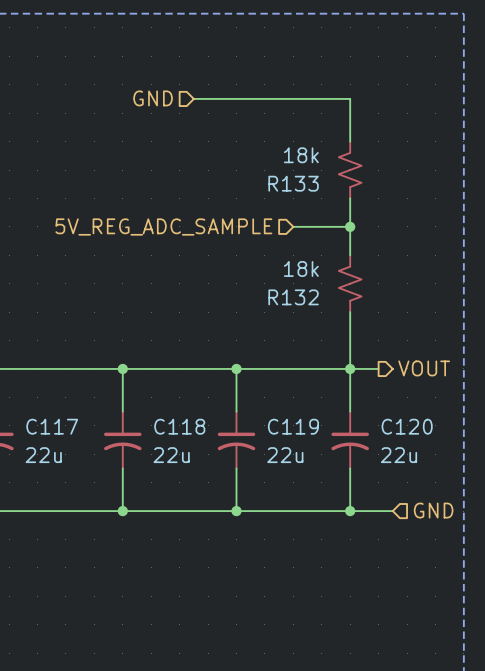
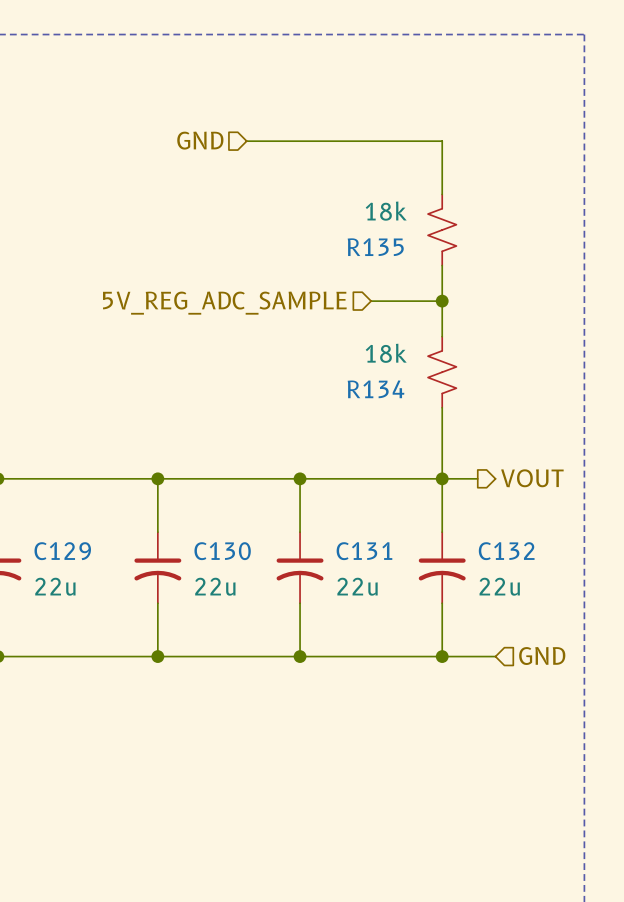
R133 name: R133 (293, 183) -> R135 (375, 247)
R132 name: R132 (293, 297) -> R134 (376, 389)
C117 name: C117 (52, 426) -> C129 (62, 551)
C118 name: C118 (179, 426) -> C130 (222, 551)
C119 name: C119 (293, 426) -> C131 (364, 551)
C120 name: C120 (407, 426) -> C132 (506, 551)

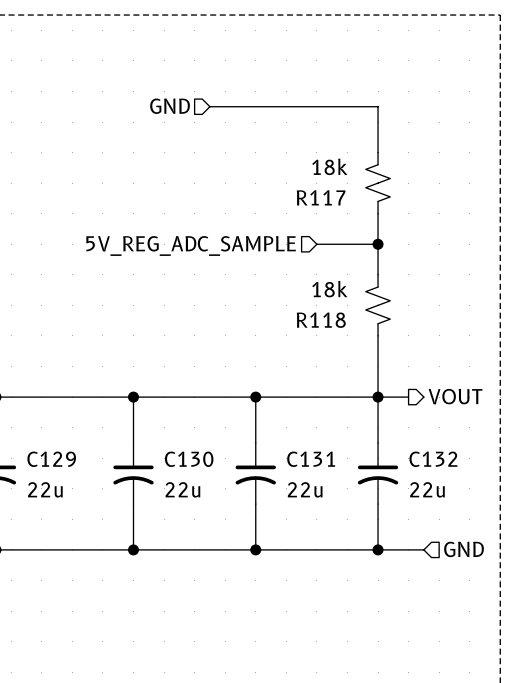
R135 name: R135 (375, 247) -> R117 (321, 197)
R134 name: R134 (376, 389) -> R118 (321, 320)

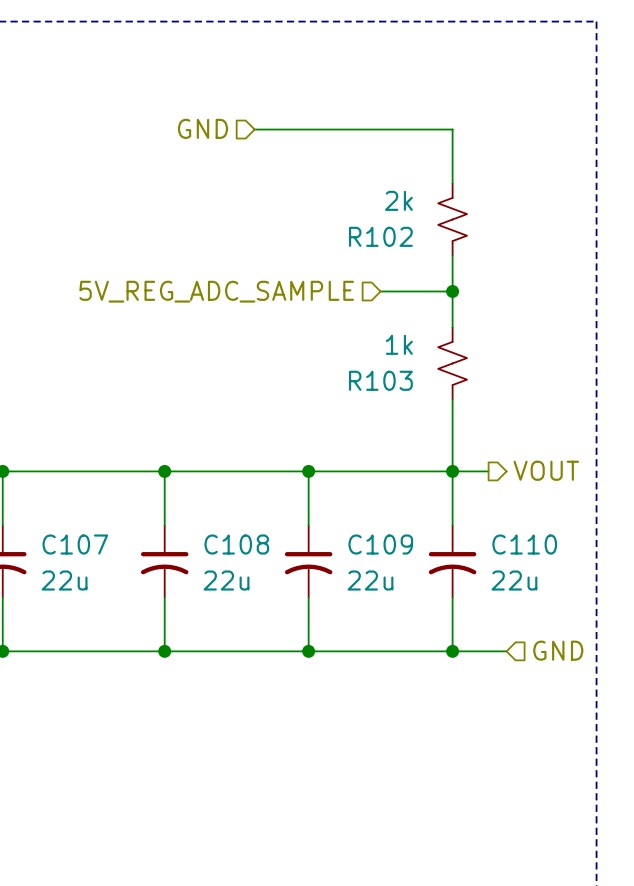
R117 value: 18k (329, 166) -> 2k (398, 200)
R117 name: R117 (321, 197) -> R102 (380, 236)
R118 value: 18k (329, 289) -> 1k (399, 344)
R118 name: R118 (321, 320) -> R103 (380, 380)
C129 name: C129 (51, 459) -> C107 (75, 544)
C130 name: C130 (189, 459) -> C108 (236, 544)
C131 name: C131 (311, 459) -> C109 (380, 544)
C132 name: C132 (433, 459) -> C110 (524, 544)

